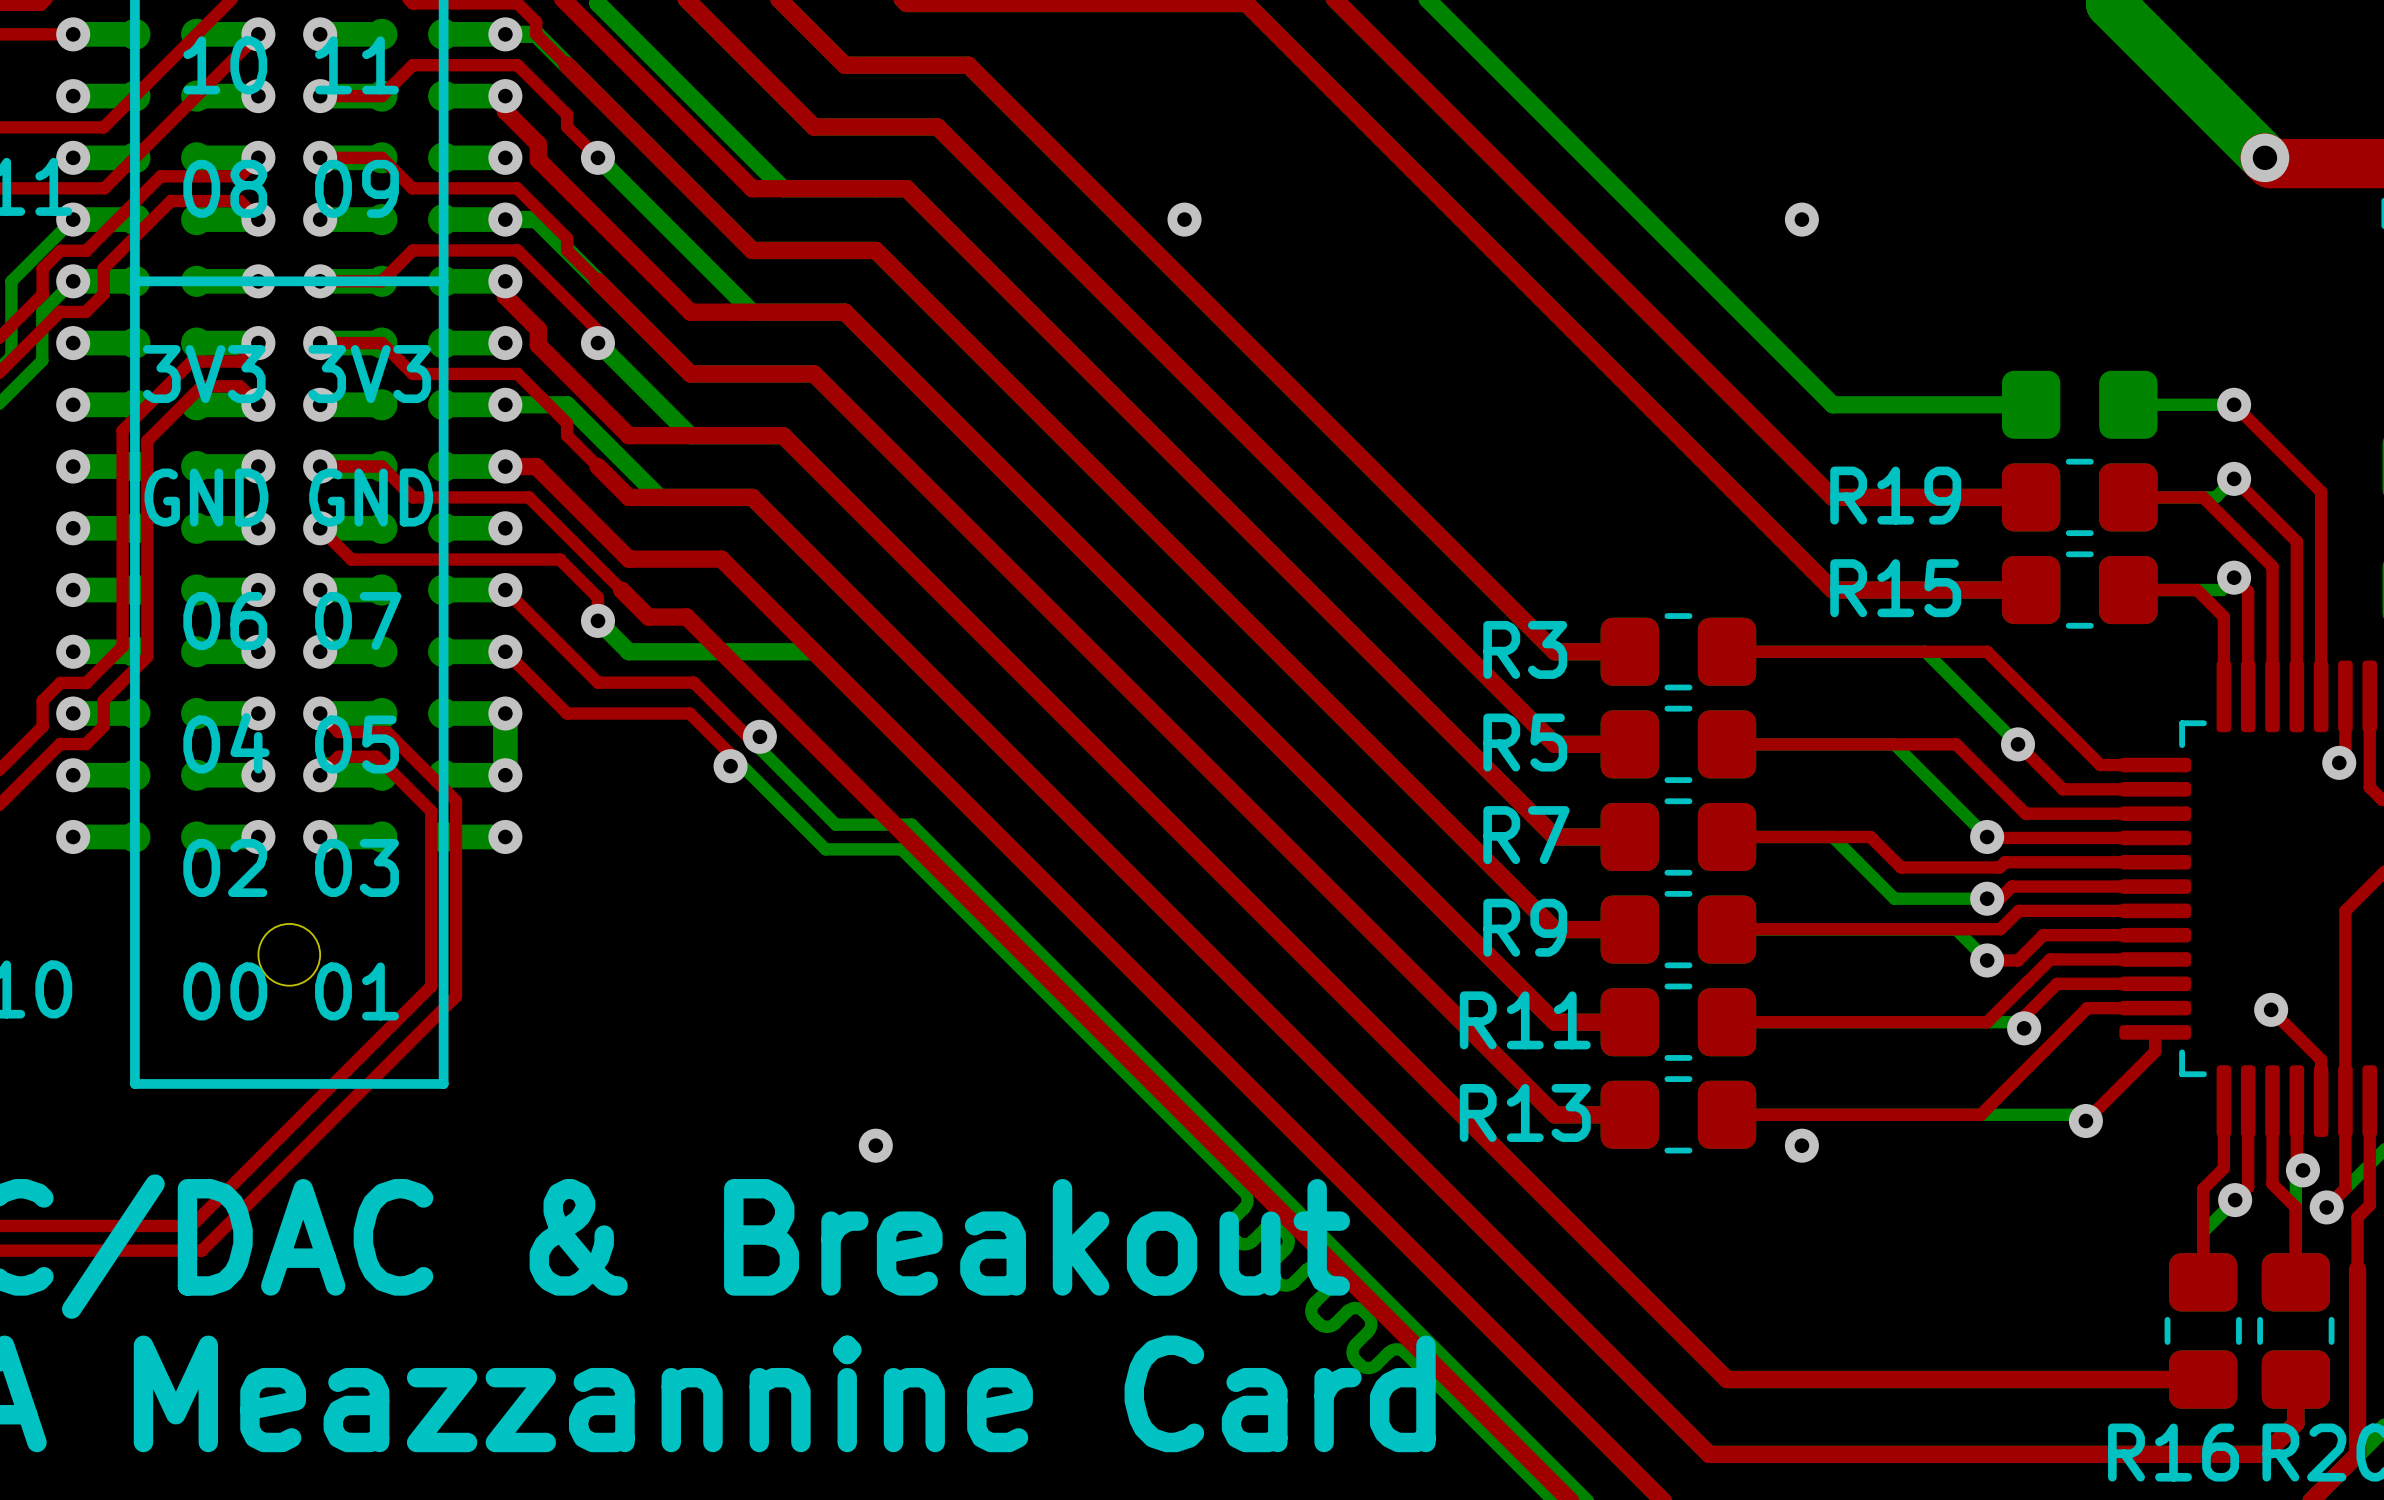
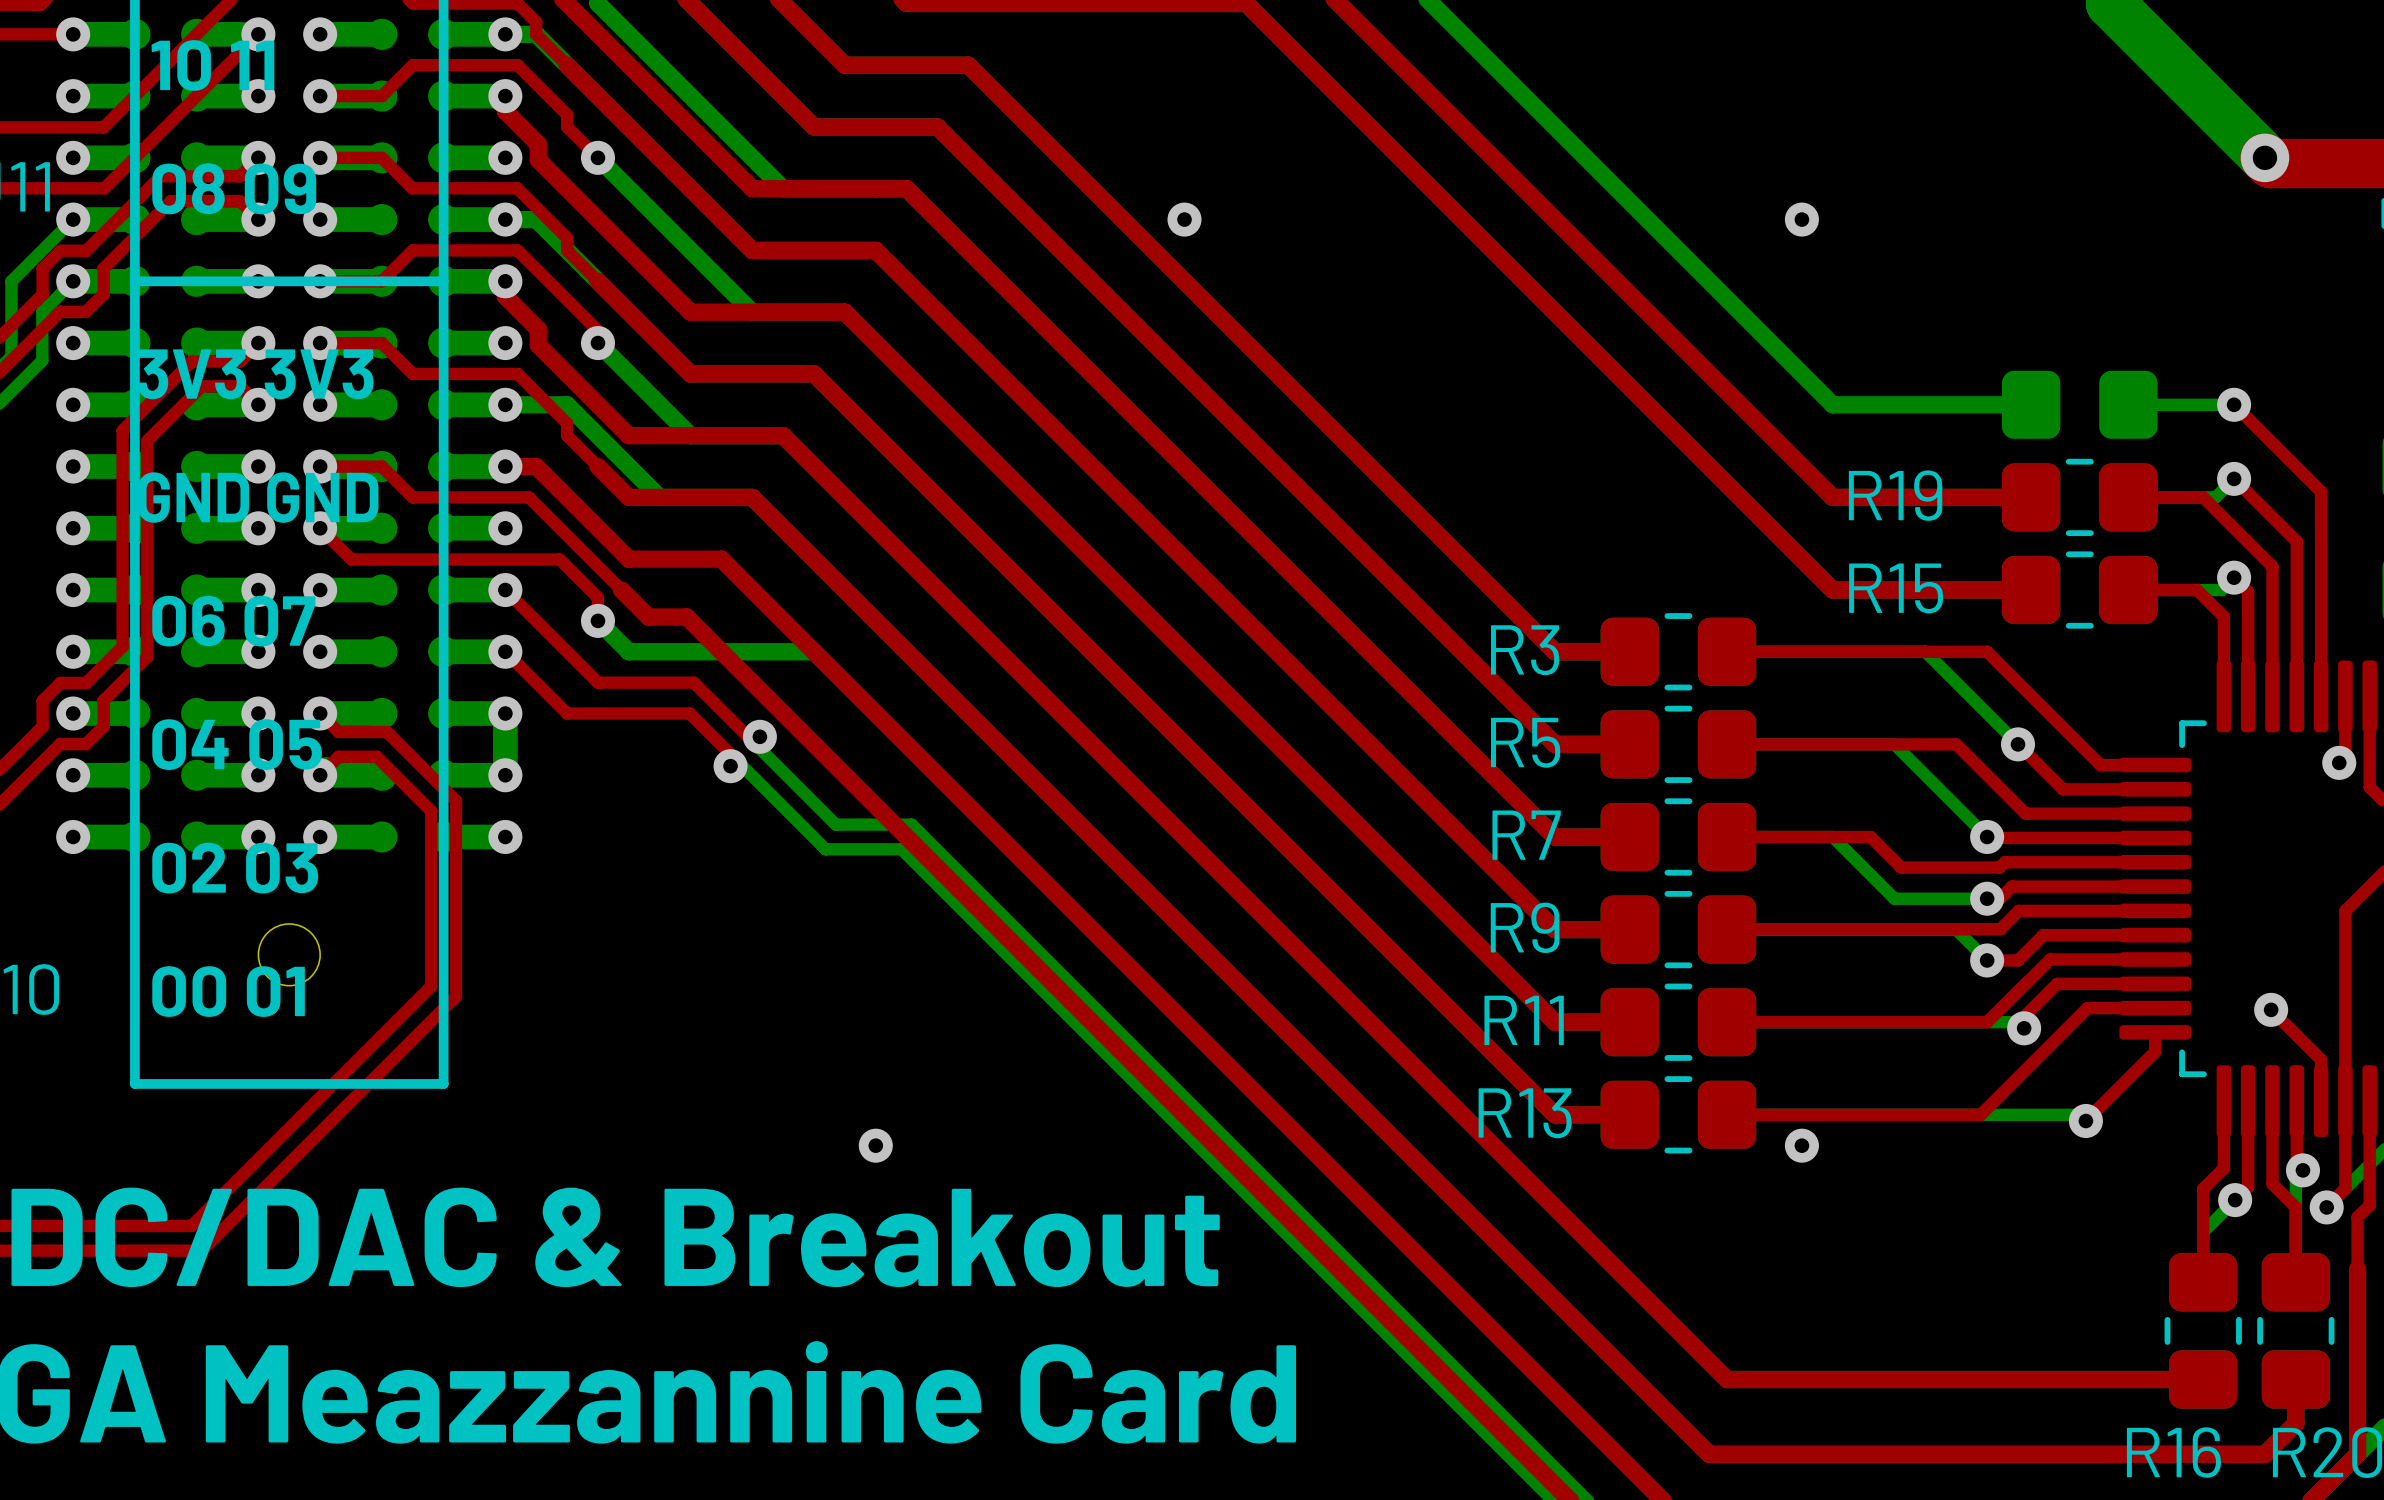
bottom track: (1244, 1191) (1247, 1197) (1246, 1205) (1231, 1221) (1228, 1227) (1229, 1233) (1236, 1240) (1243, 1244) (1249, 1243) (1270, 1225) (1281, 1229) -> (1244, 1191) (1281, 1229)
bottom track: (1285, 1233) (1288, 1238) (1288, 1244) (1270, 1265) (1270, 1271) (1273, 1278) (1280, 1284) (1287, 1285) (1293, 1283) (1309, 1268) (1316, 1267) (1322, 1270) -> (1285, 1233) (1322, 1270)
bottom track: (1326, 1274) (1329, 1281) (1328, 1287) (1311, 1308) (1314, 1319) (1322, 1325) (1328, 1326) (1334, 1324) (1350, 1309) (1358, 1308) (1363, 1311) -> (1326, 1274) (1363, 1311)
bottom track: (1367, 1315) (1370, 1320) (1370, 1328) (1352, 1349) (1352, 1355) (1355, 1360) (1363, 1366) (1369, 1368) (1375, 1365) (1391, 1350) (1398, 1349) (1405, 1352) -> (1367, 1315) (1405, 1352)

